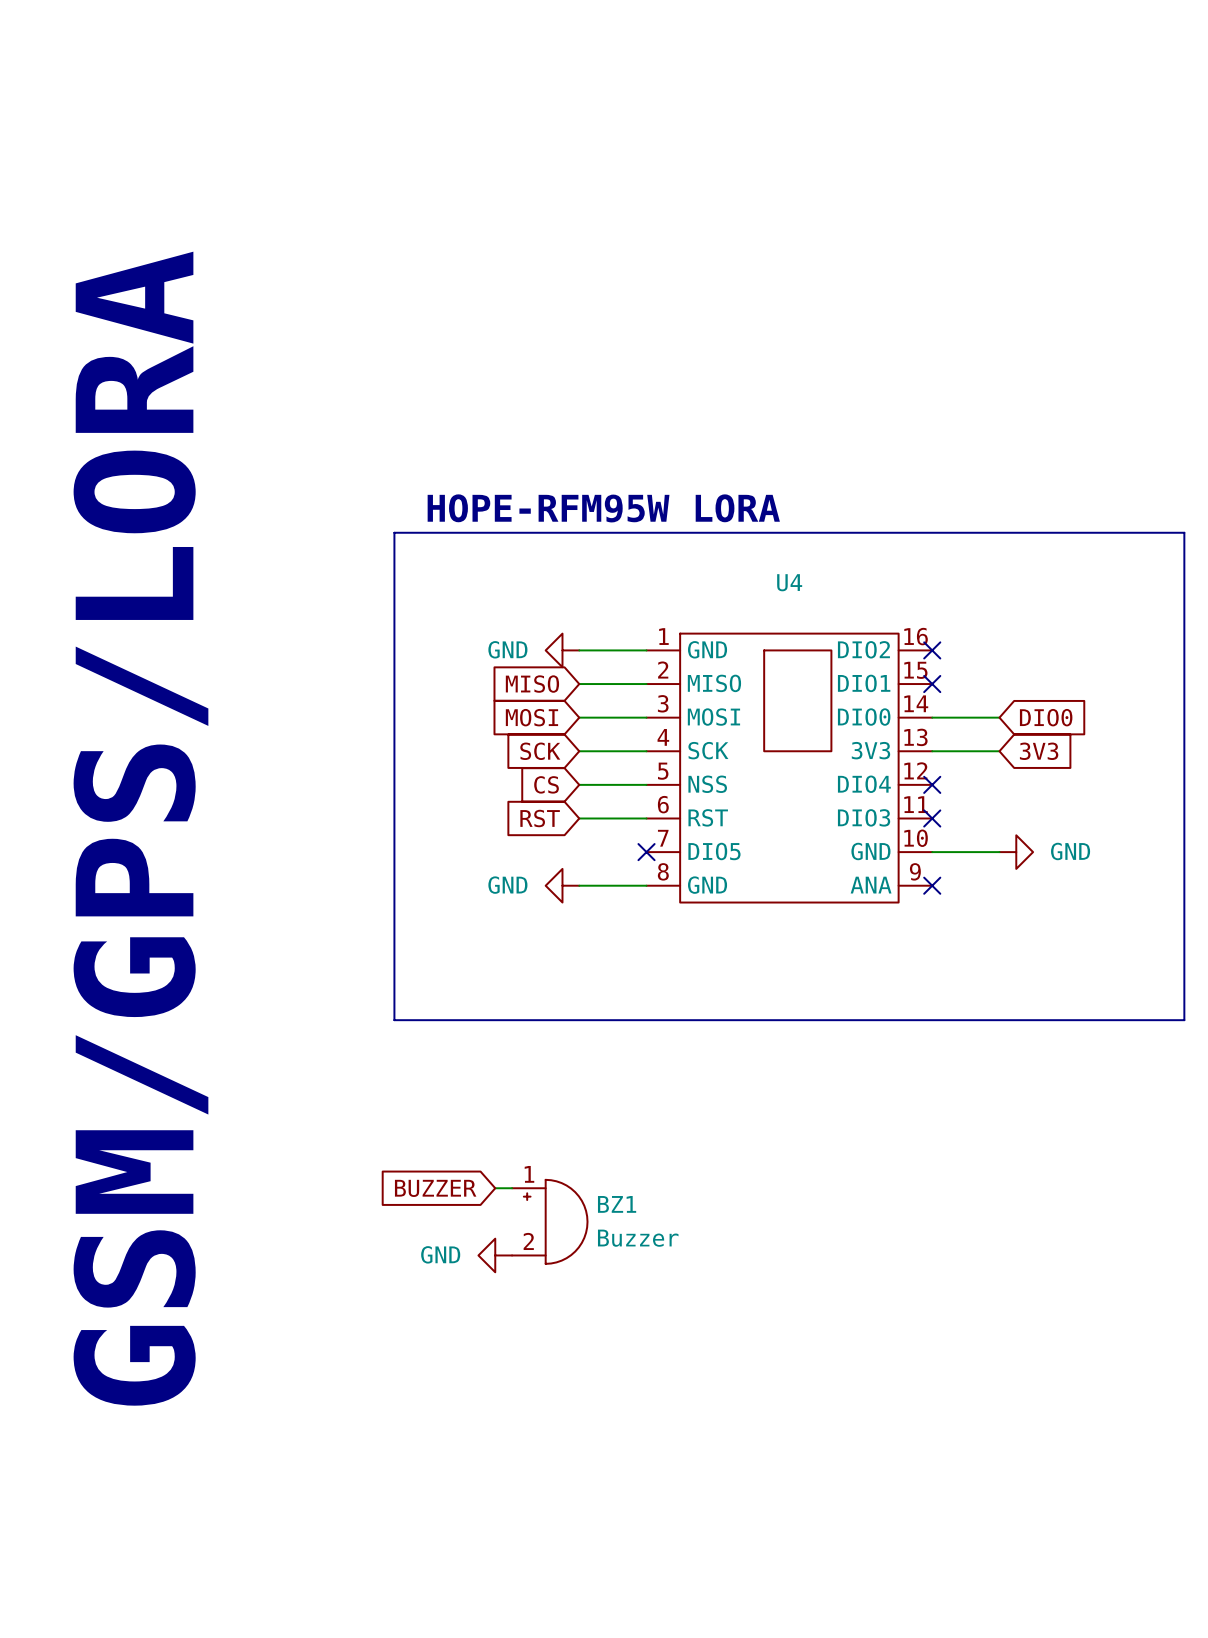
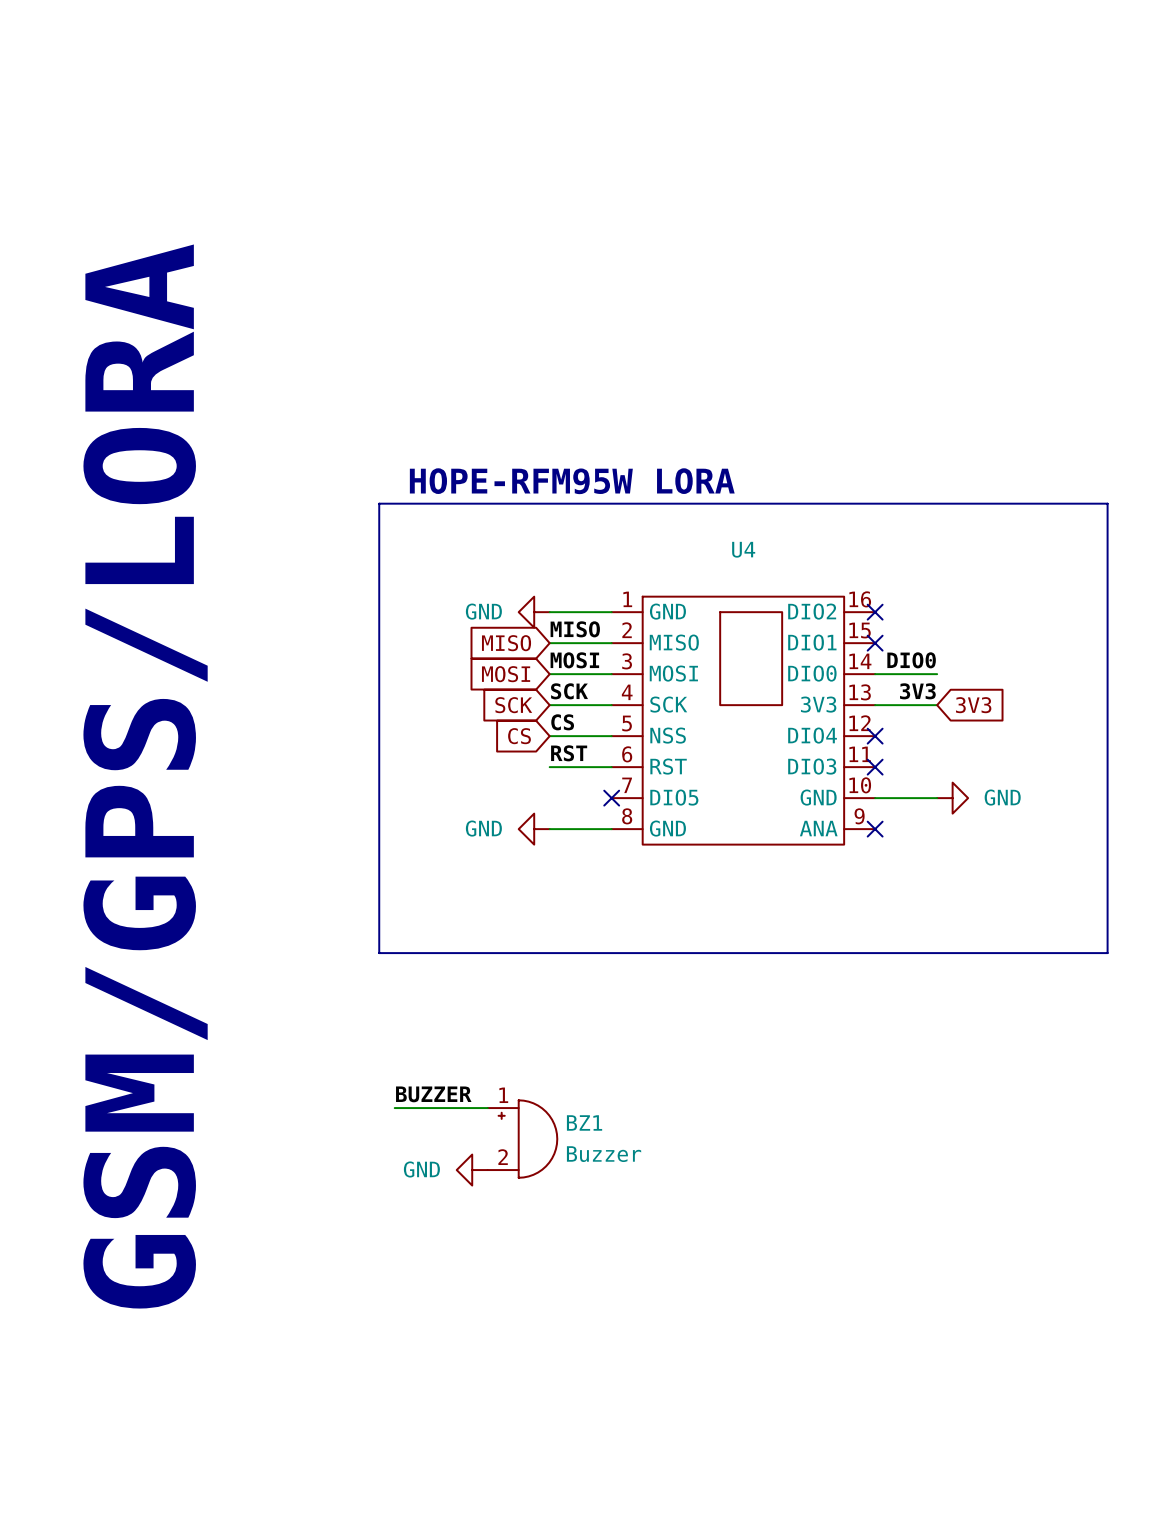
label: none -> MISO (575, 629)
label: none -> MOSI (574, 660)
label: none -> DIO0 (911, 660)
global label: DIO0 (1046, 717) -> none
label: none -> SCK (569, 691)
label: none -> 3V3 (917, 691)
label: none -> CS (562, 722)
label: none -> RST (569, 753)
global label: RST (540, 818) -> none
label: none -> BUZZER (433, 1094)
wire: none -> (394, 1108) (472, 1108)
global label: BUZZER (435, 1188) -> none

